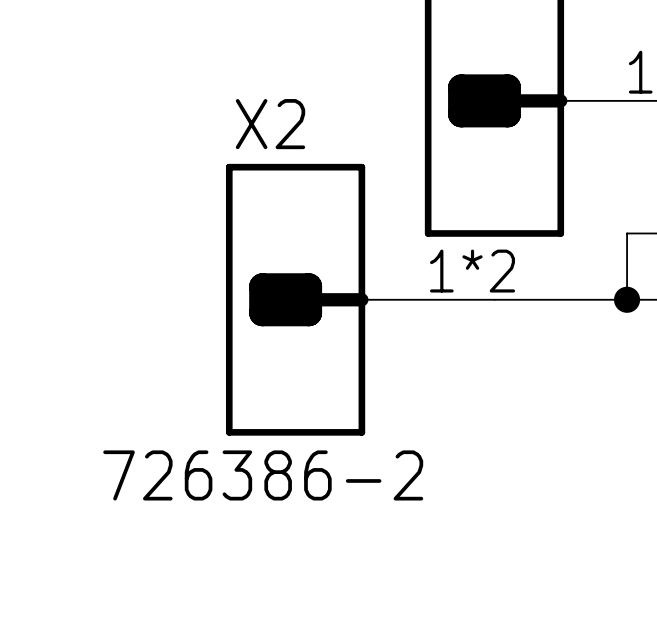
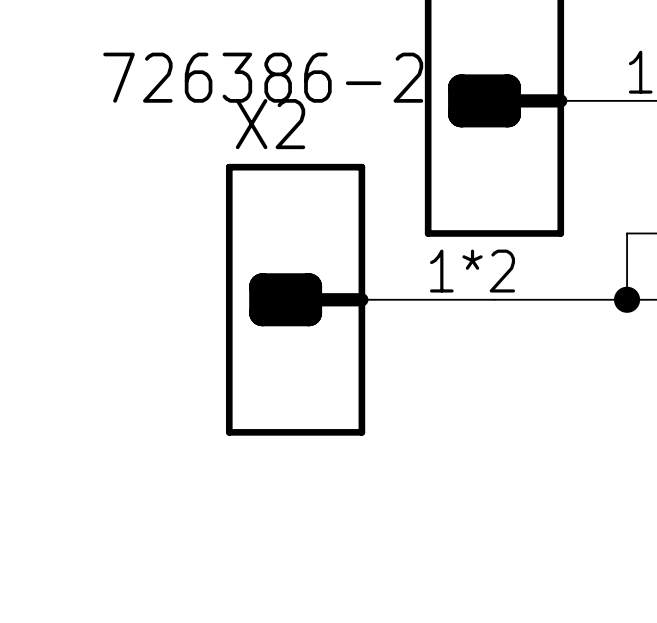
X2 value position: 726386-2 (263, 475) -> 726386-2 (263, 77)

